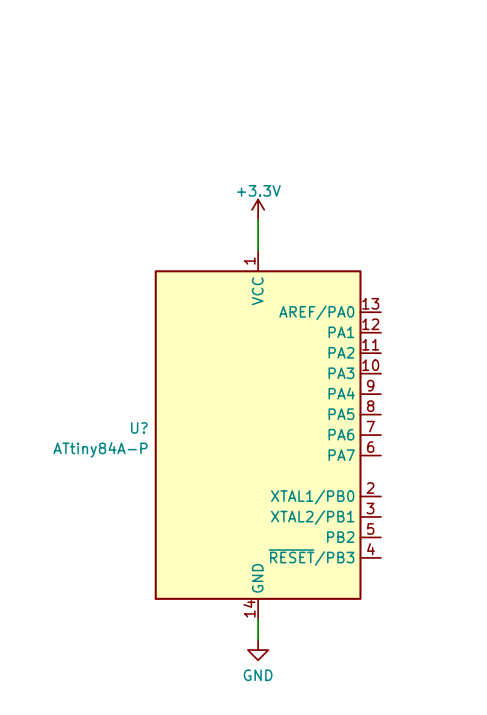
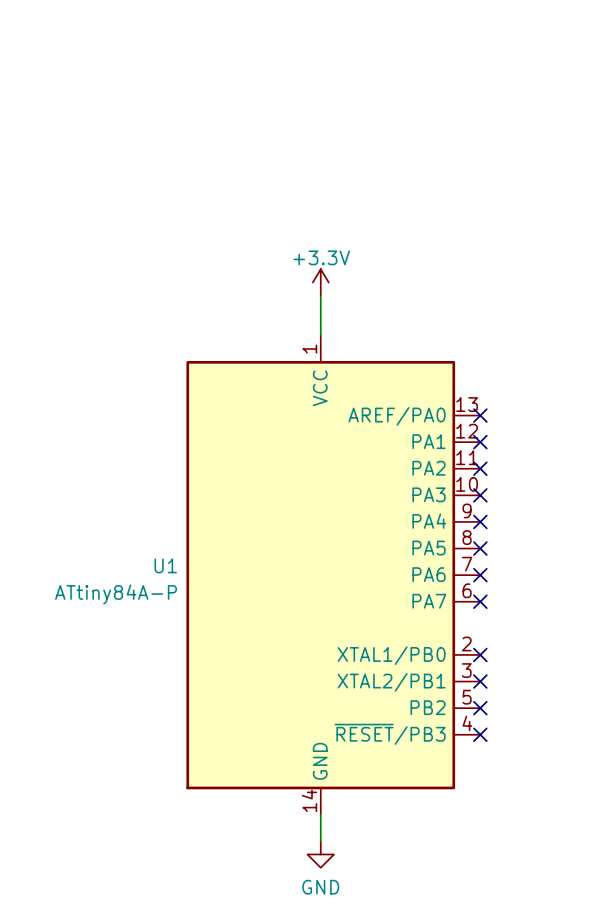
no-connect mark: none -> (480, 415)
no-connect mark: none -> (480, 442)
no-connect mark: none -> (480, 468)
no-connect mark: none -> (480, 495)
no-connect mark: none -> (480, 521)
no-connect mark: none -> (480, 548)
U? name: U? (139, 427) -> U1 (165, 565)
no-connect mark: none -> (480, 575)
no-connect mark: none -> (480, 601)
no-connect mark: none -> (480, 654)
no-connect mark: none -> (480, 681)
no-connect mark: none -> (480, 708)
no-connect mark: none -> (480, 734)

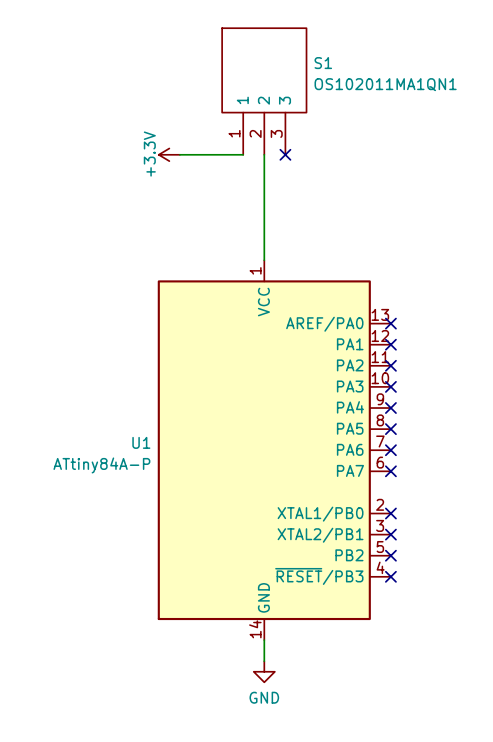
S1: none -> OS102011MA1QN1 (264, 91)
wire: none -> (179, 154) (243, 154)
wire: none -> (264, 154) (264, 228)
no-connect mark: none -> (285, 154)
power symbol rotation: 0° (320, 282) -> 90° counterclockwise (169, 154)
power symbol position: +3.3V (320, 282) -> +3.3V (169, 154)

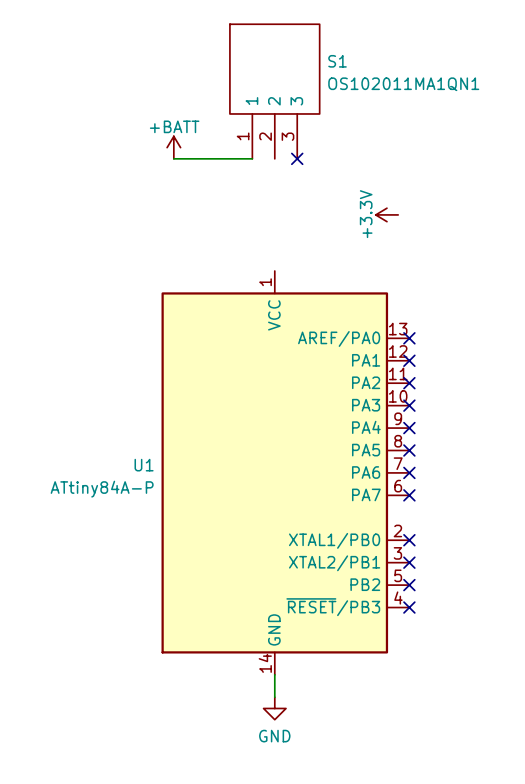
power symbol: none -> +BATT (173, 147)
power symbol position: +3.3V (169, 154) -> +3.3V (386, 214)
wire: (264, 154) (264, 260) -> none

